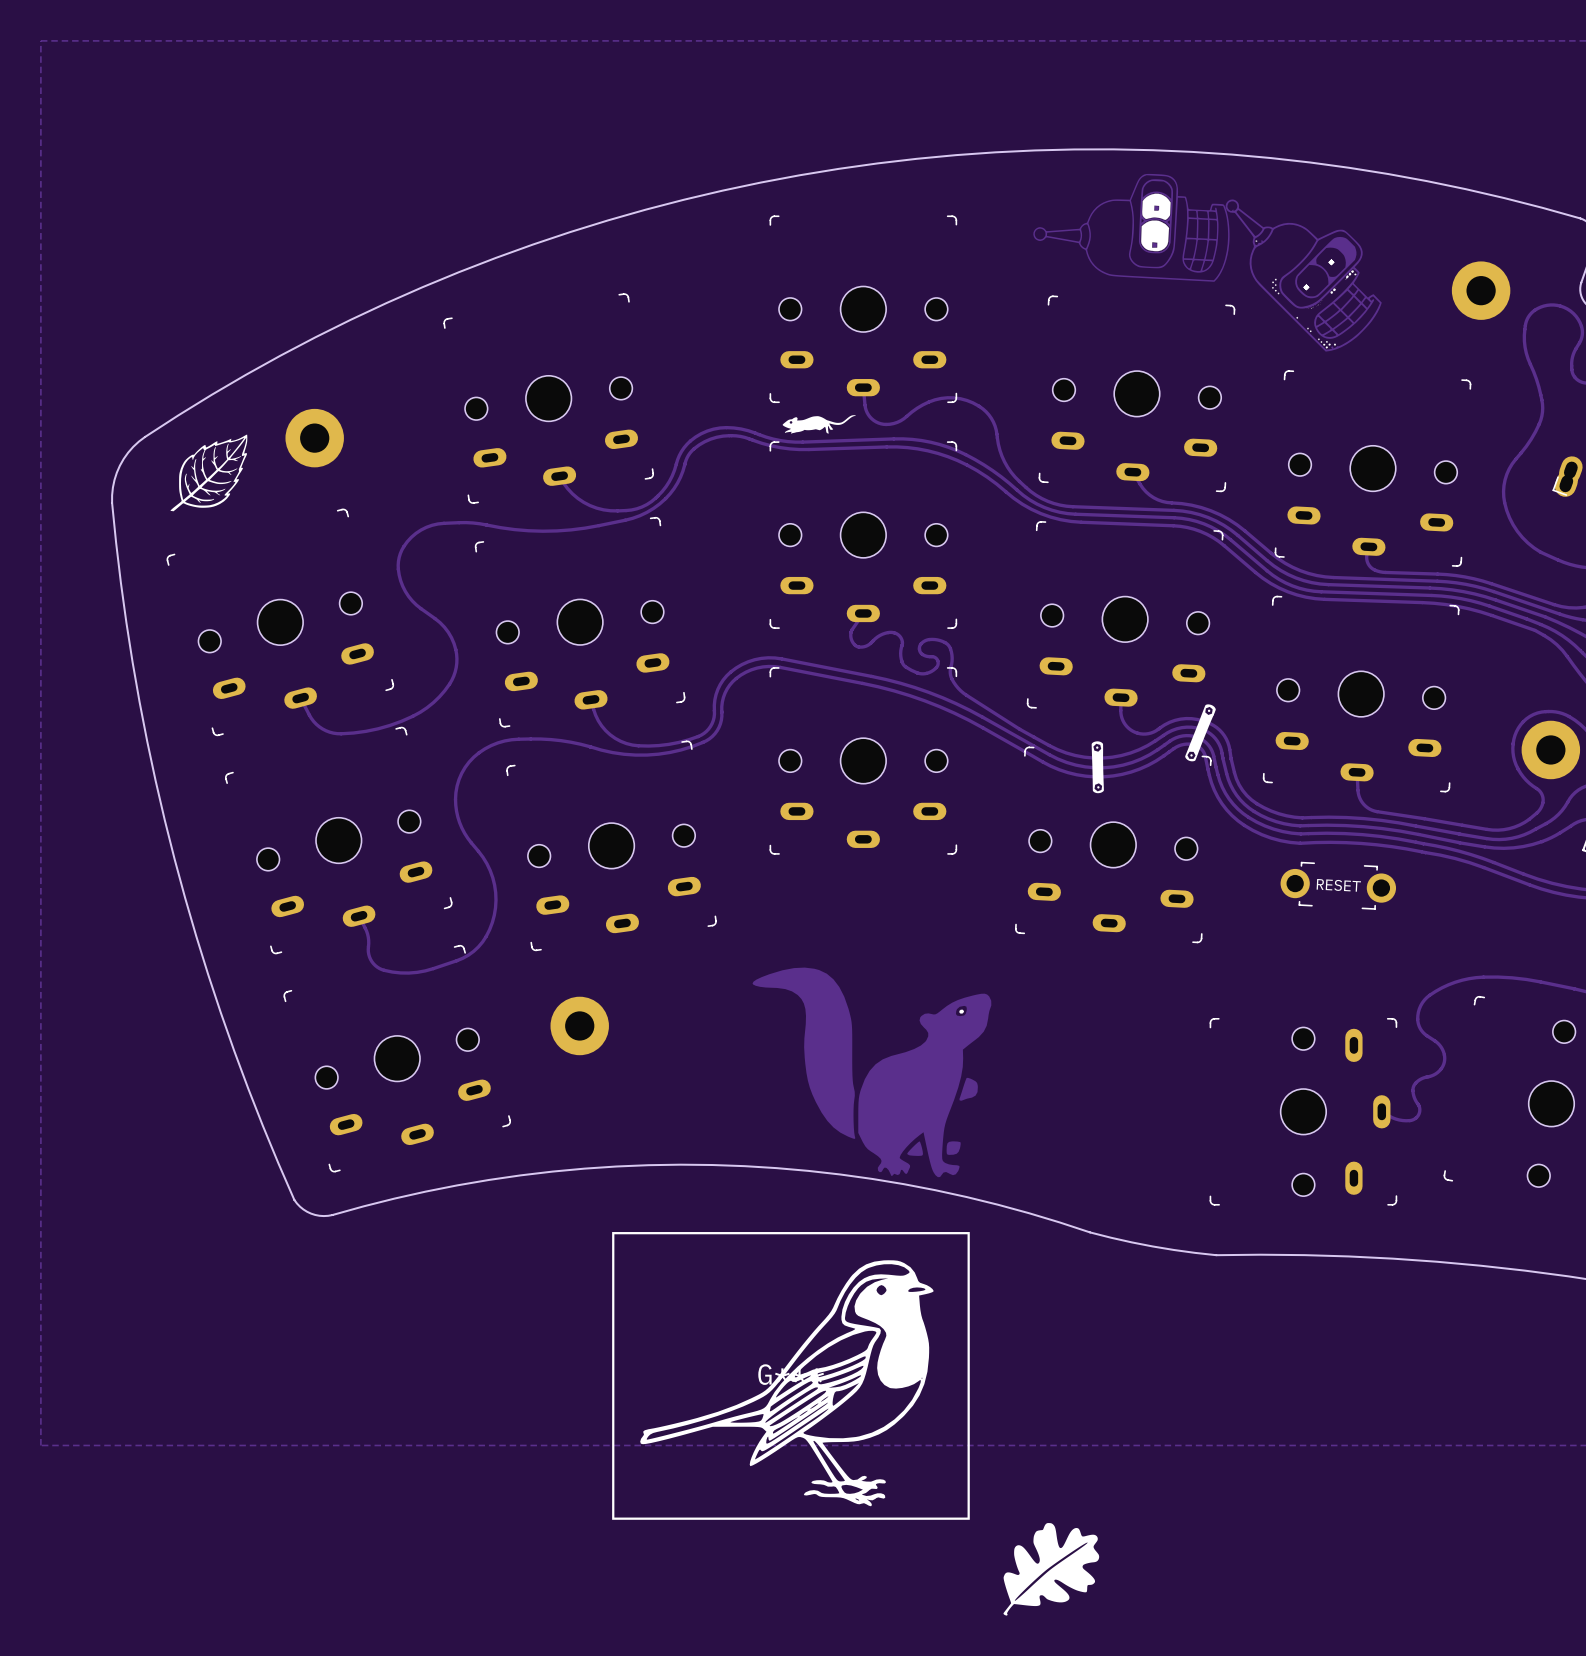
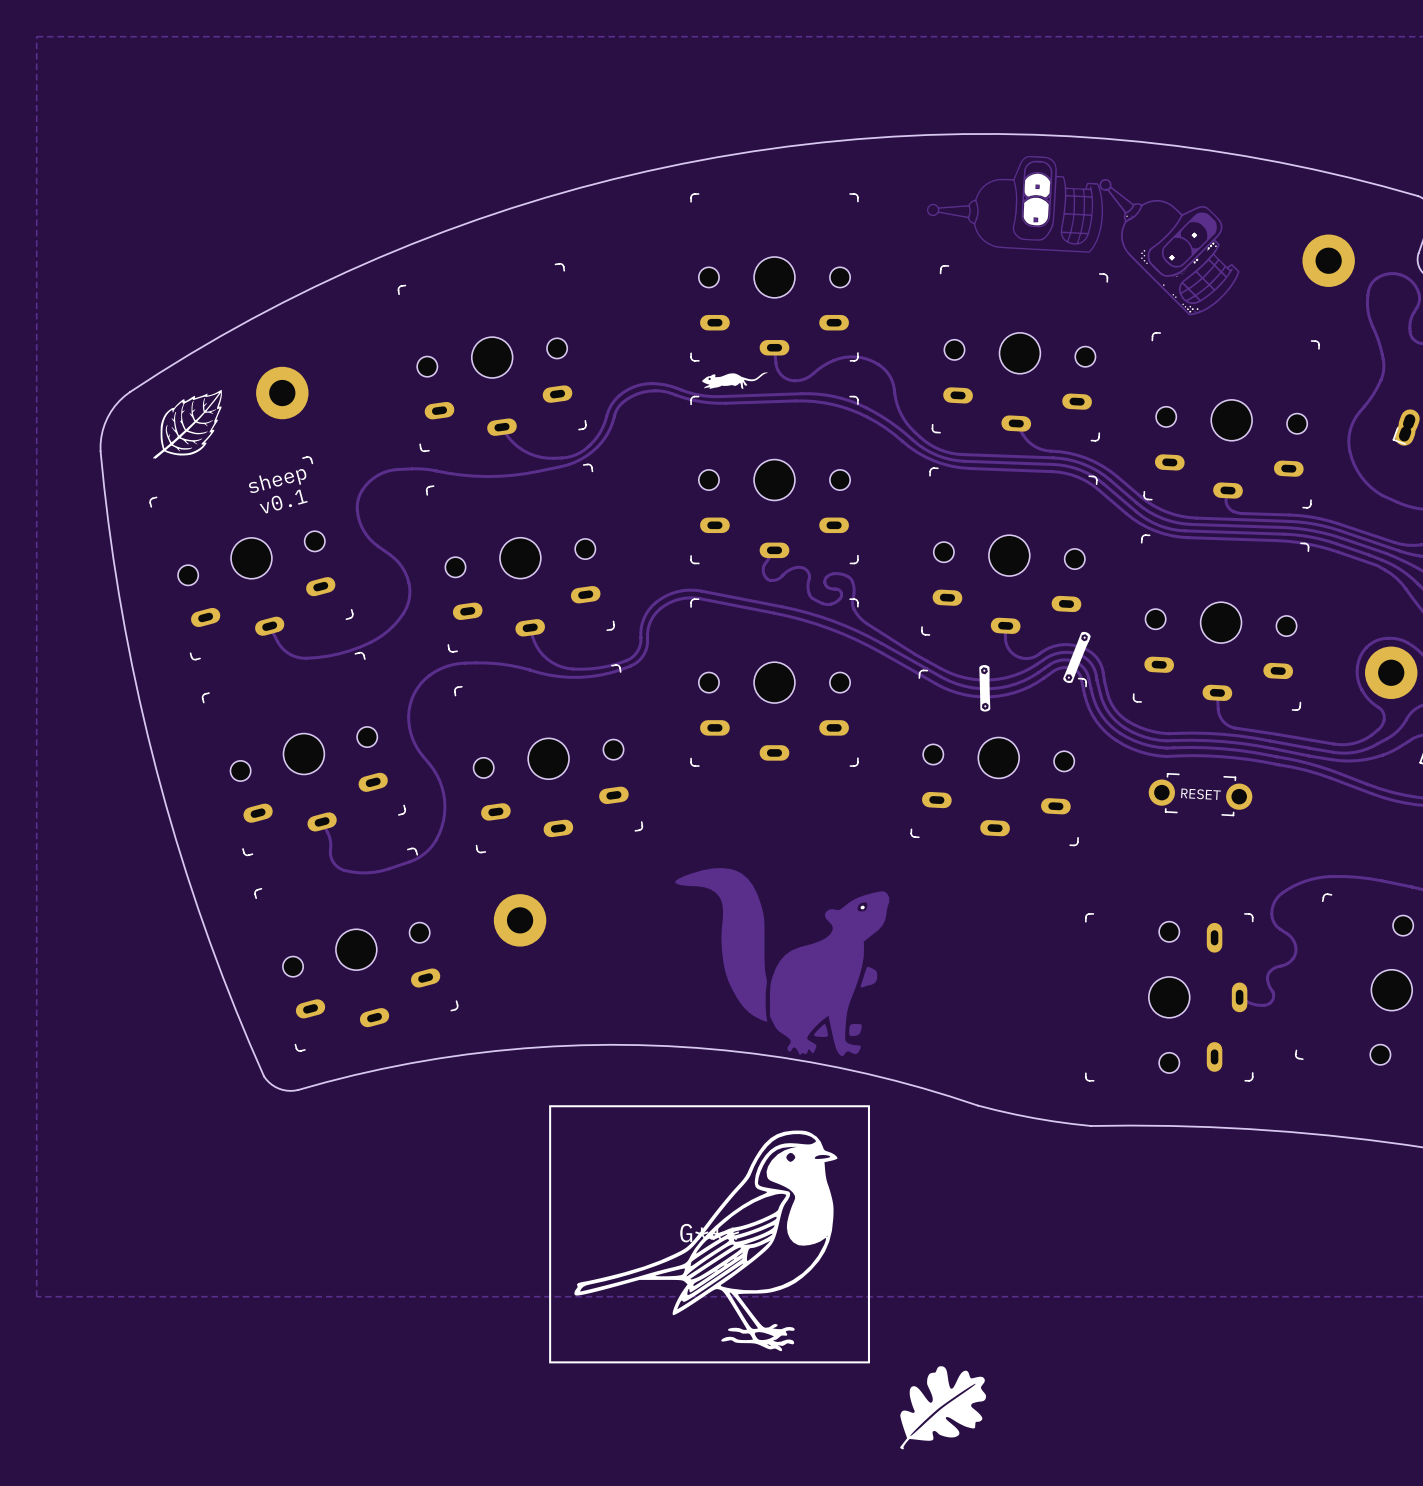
text: none -> sheep (277, 480)
text: none -> v0.1 (283, 501)

